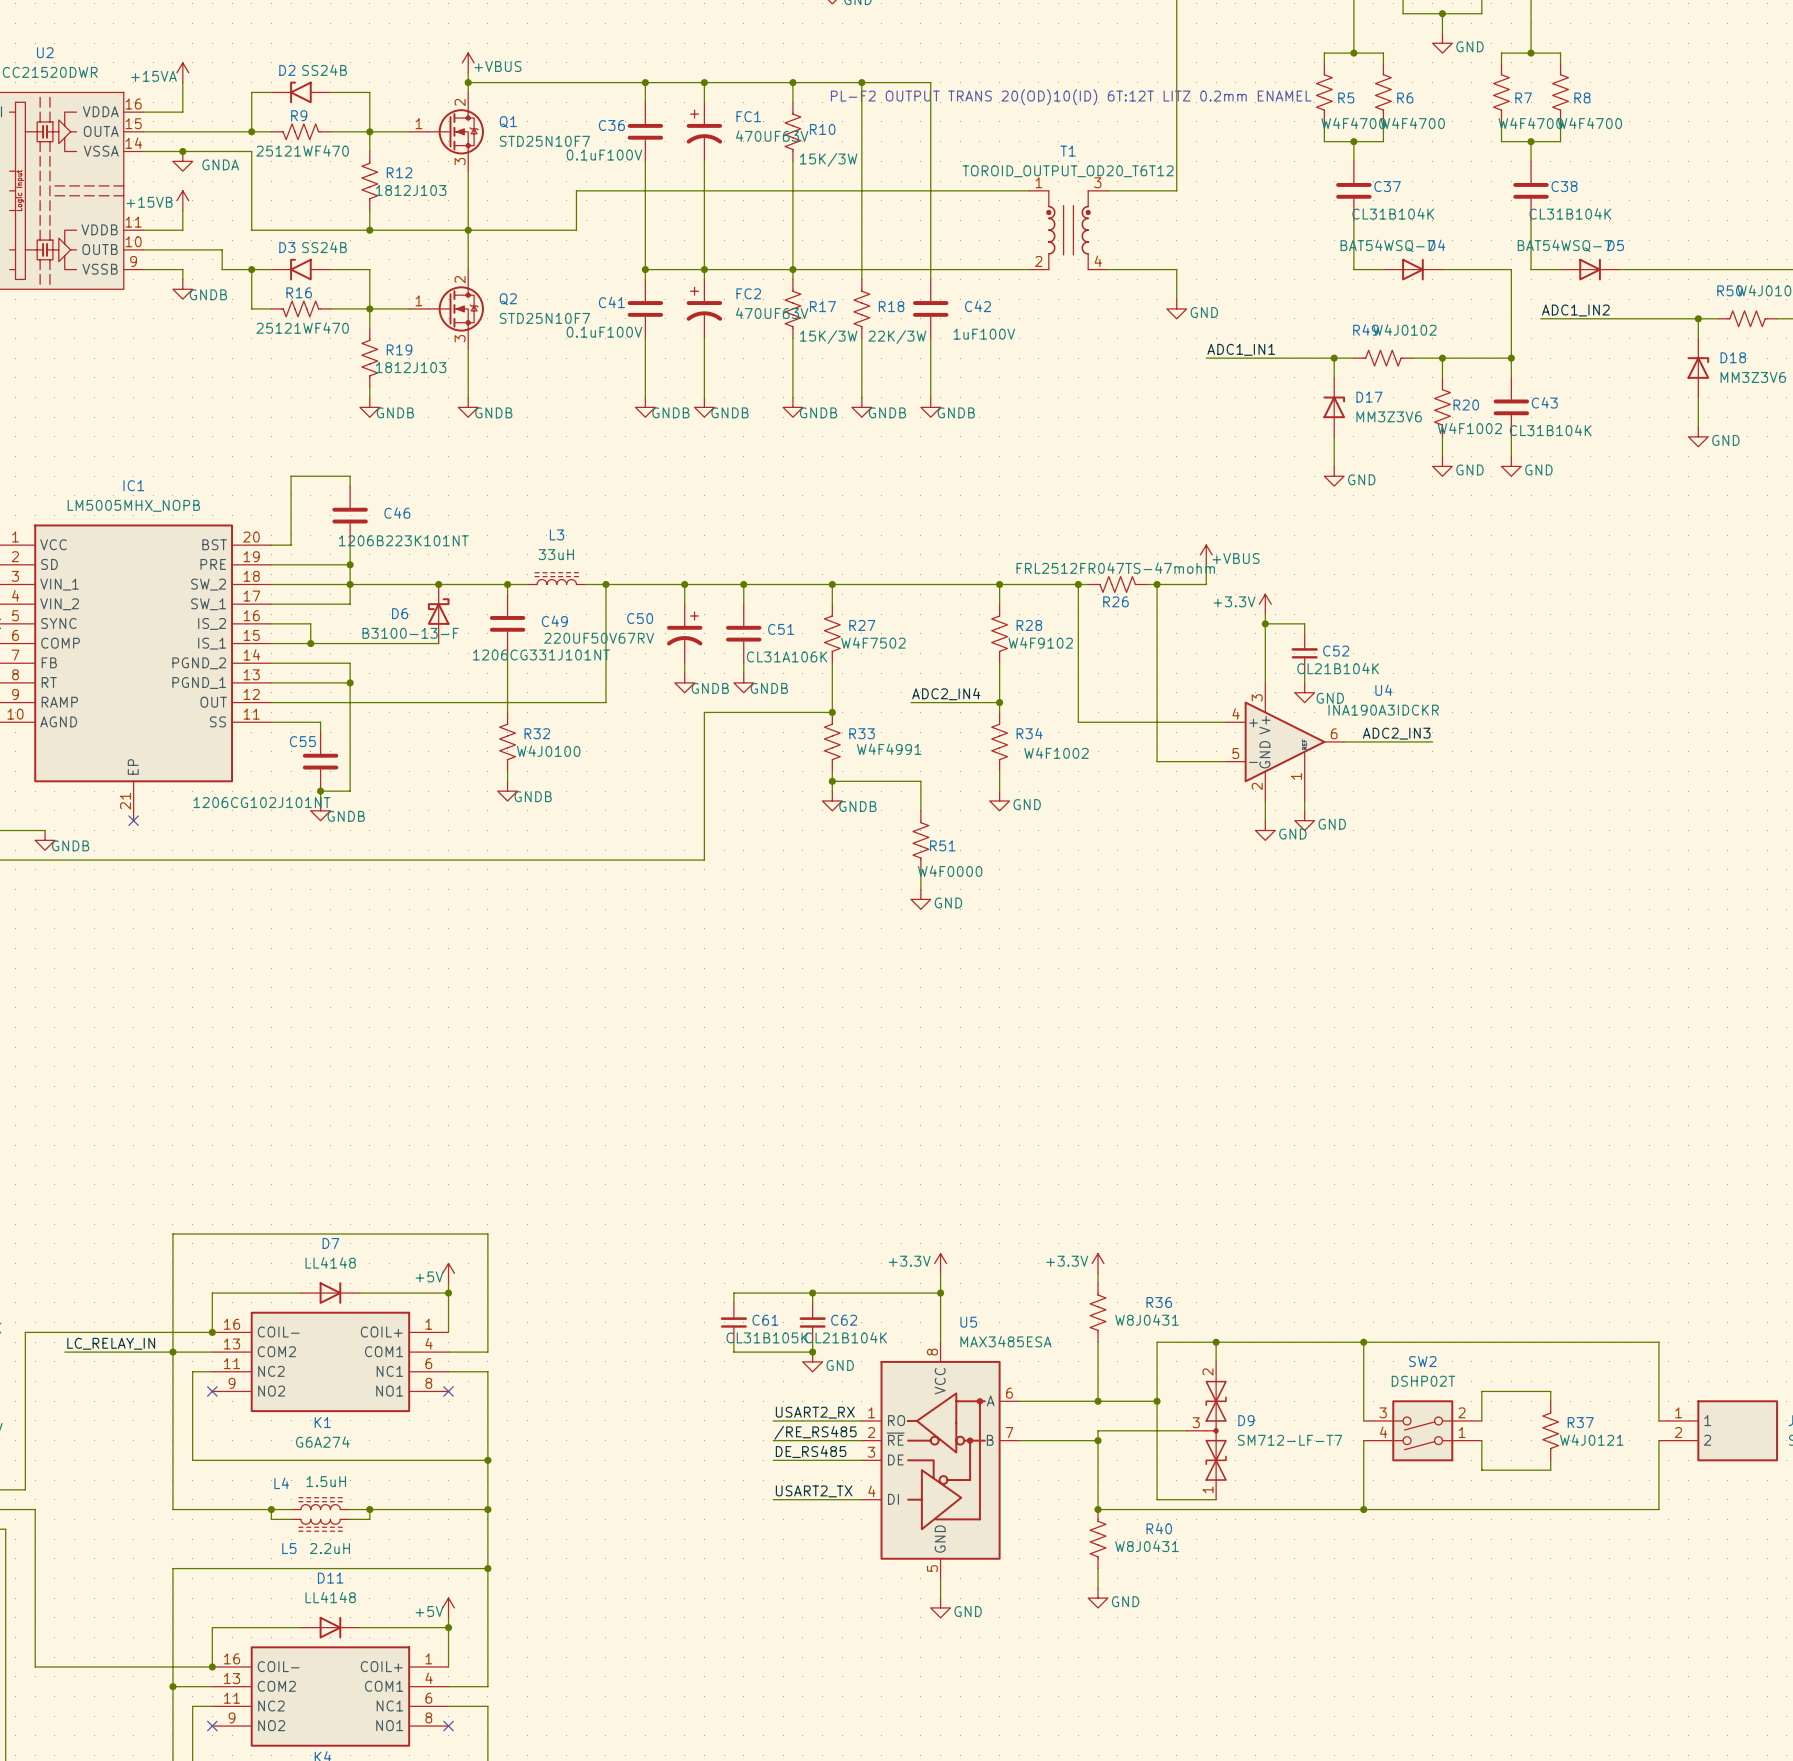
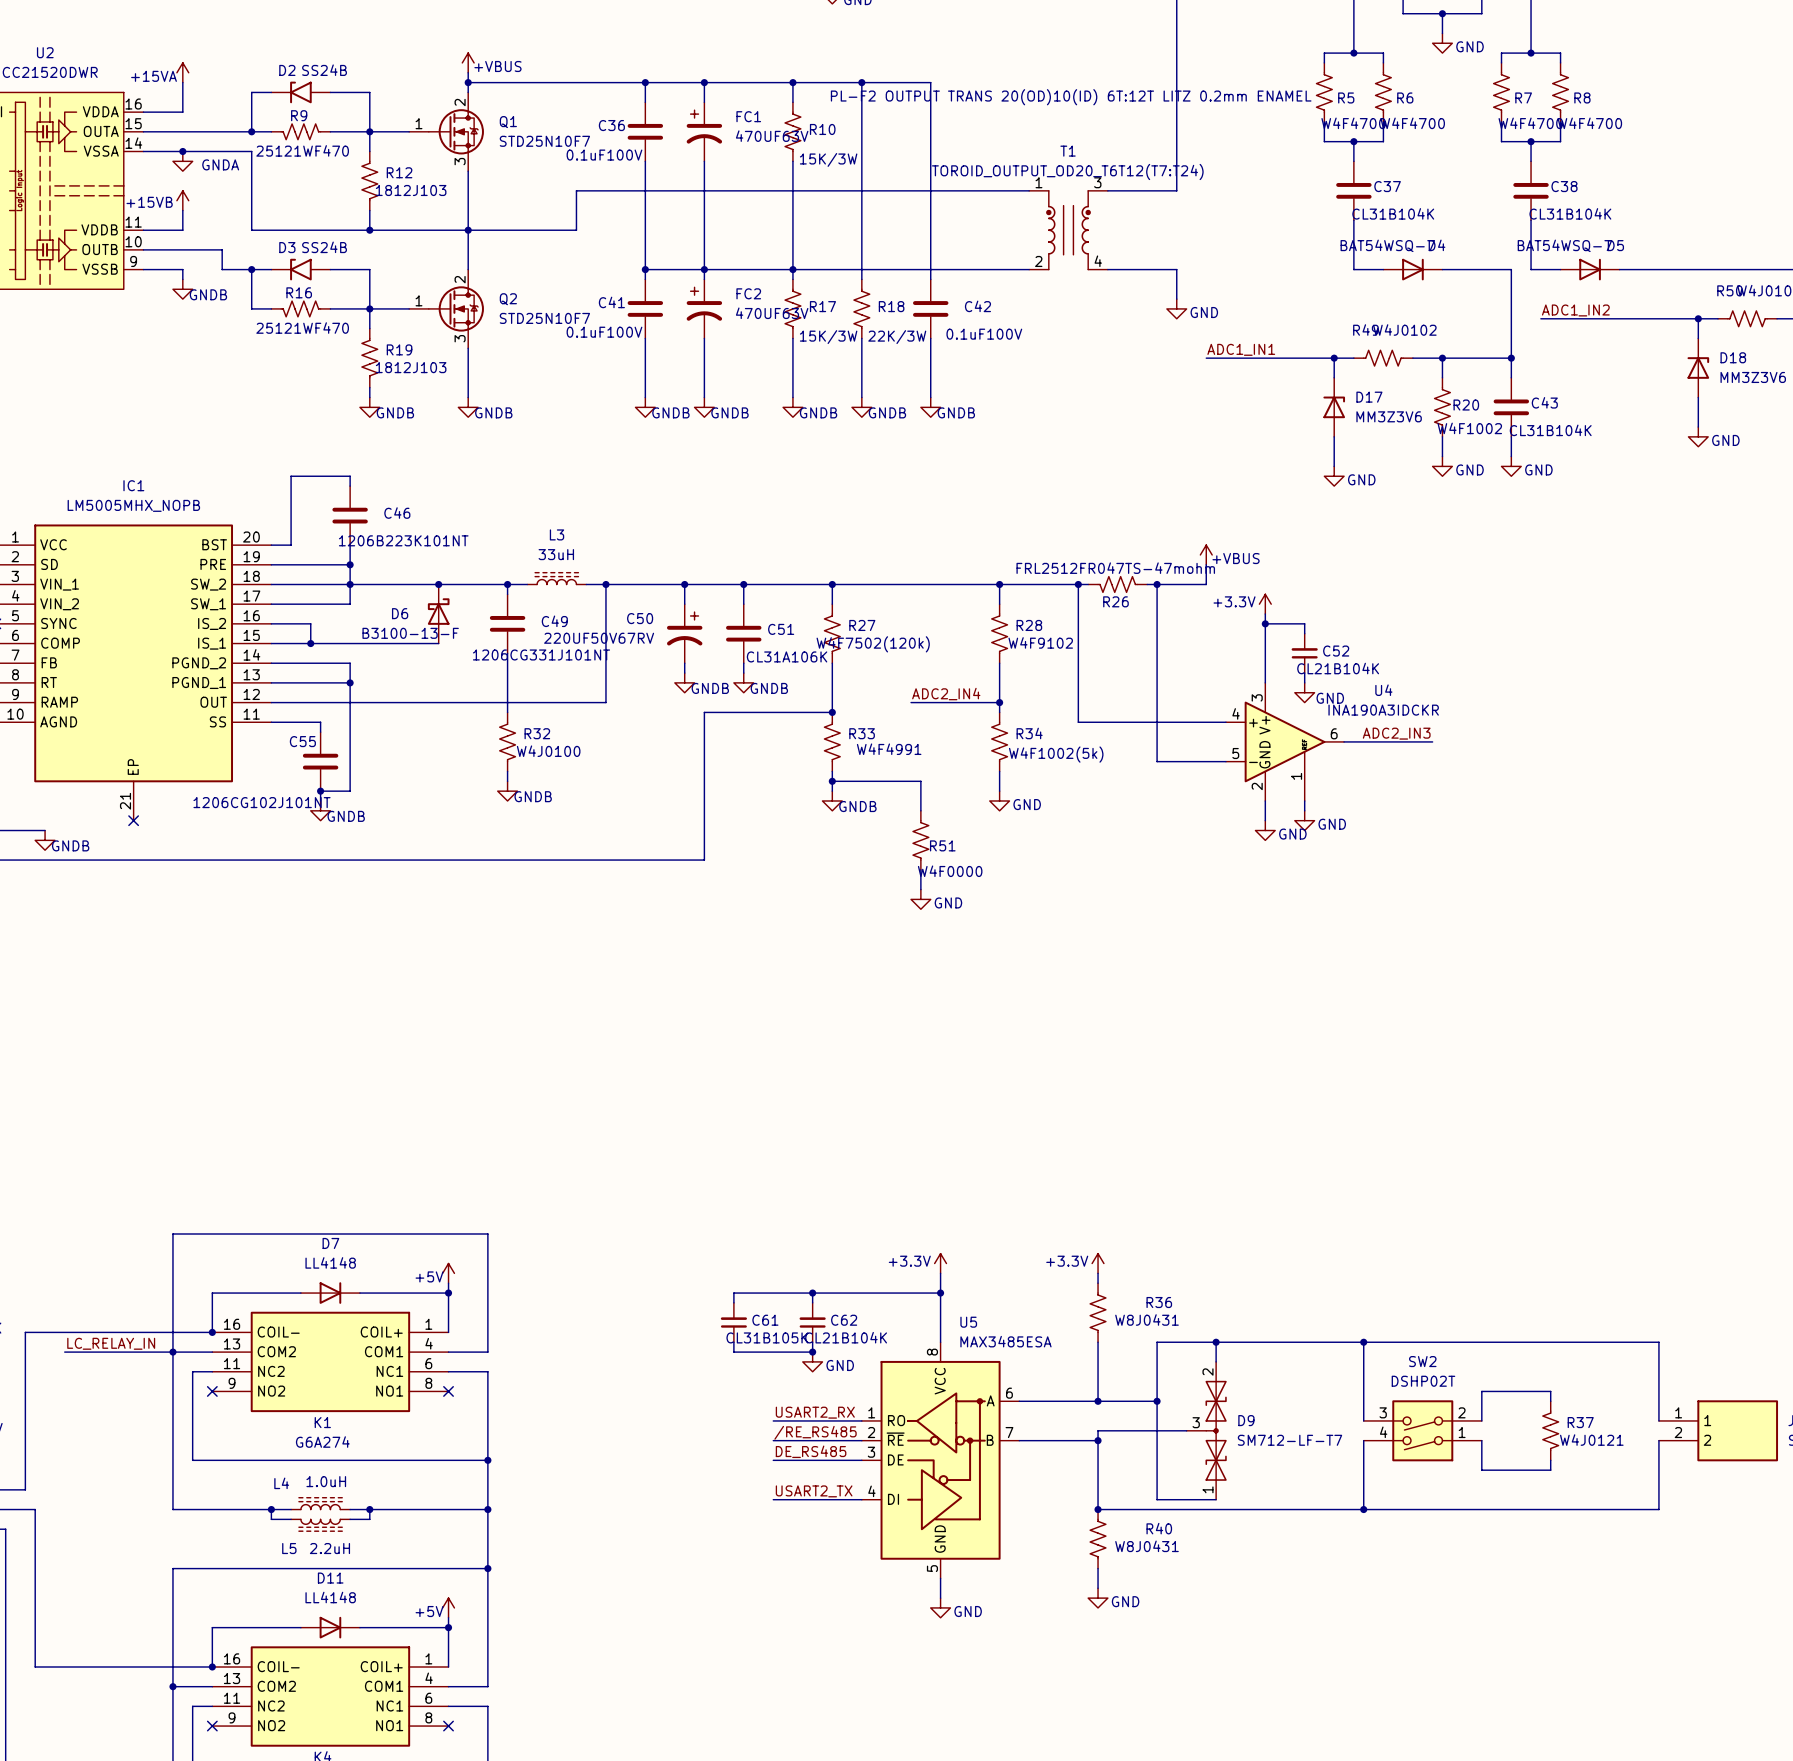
T1 value: TOROID_OUTPUT_OD20_T6T12 (1068, 171) -> TOROID_OUTPUT_OD20_T6T12(T7:T24) (1067, 171)
C42 value: 1uF100V (984, 334) -> 0.1uF100V (984, 334)
R27 value: W4F7502 (873, 642) -> W4F7502(120k) (873, 644)
R34 value: W4F1002 (1056, 753) -> W4F1002(5k) (1056, 754)
L4 value: 1.5uH (326, 1481) -> 1.0uH (326, 1481)

